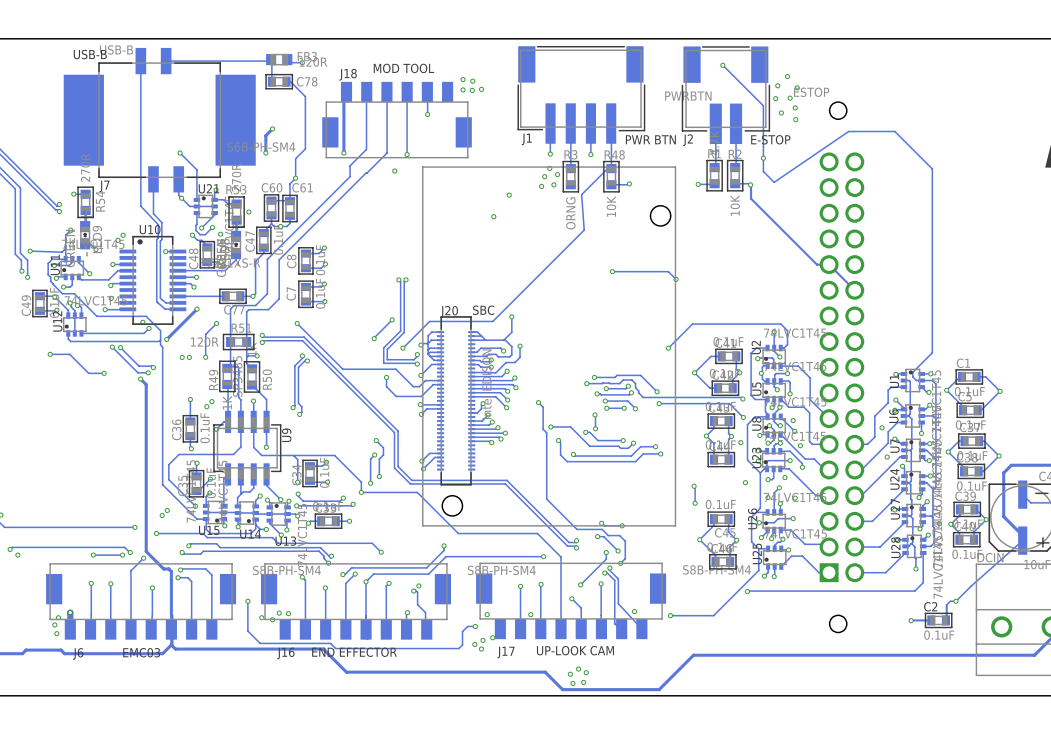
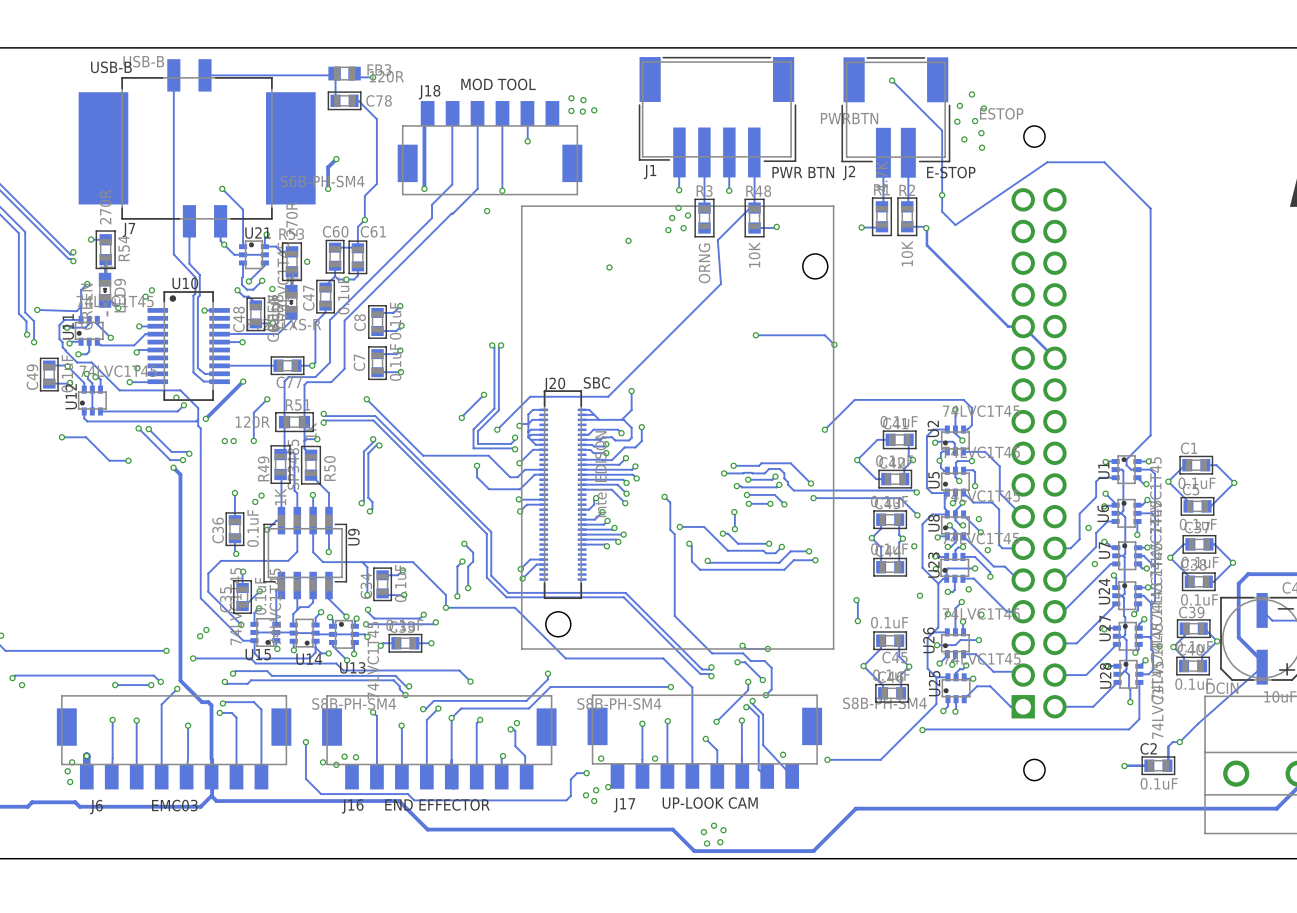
track: (177, 283) (190, 283) (193, 287) -> none
via: (193, 287) -> none

